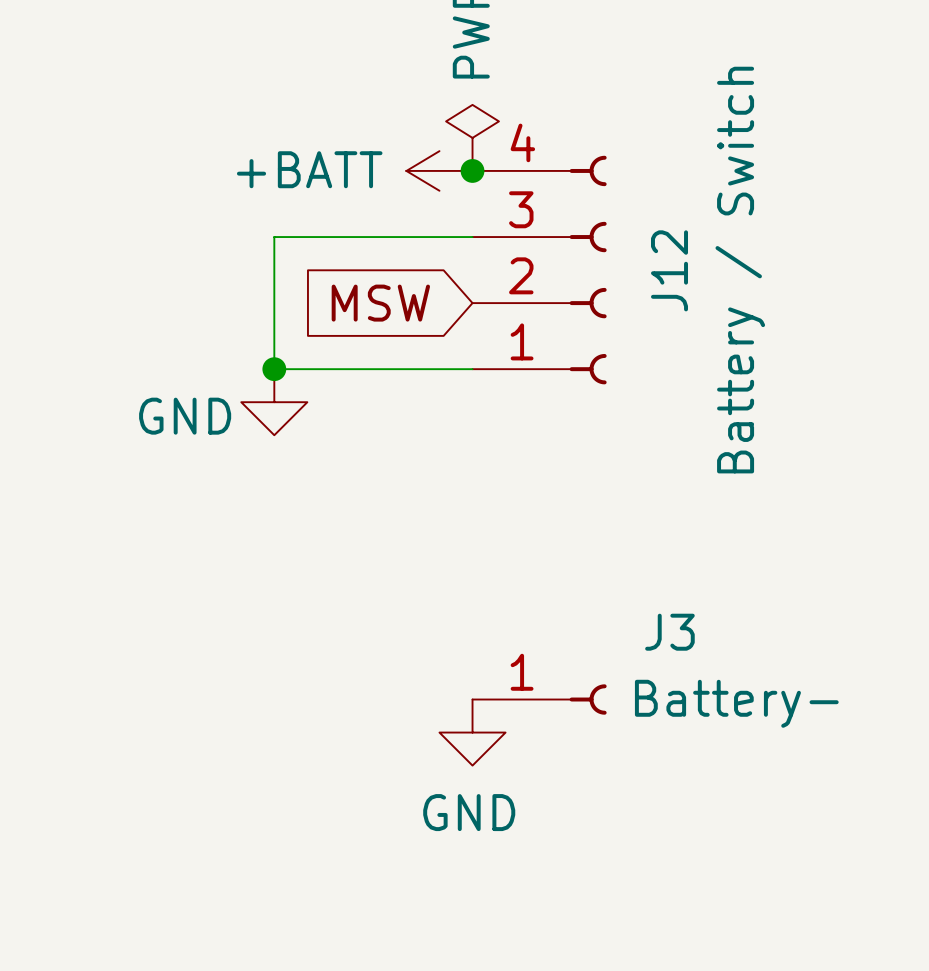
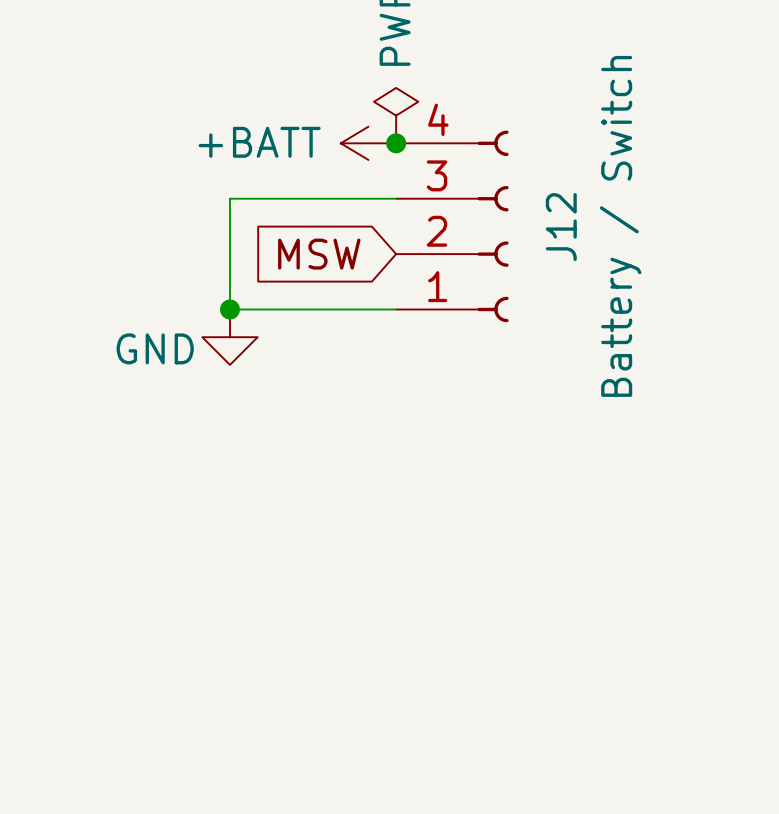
J3: Battery- (539, 699) -> none
power symbol: GND (472, 732) -> none

